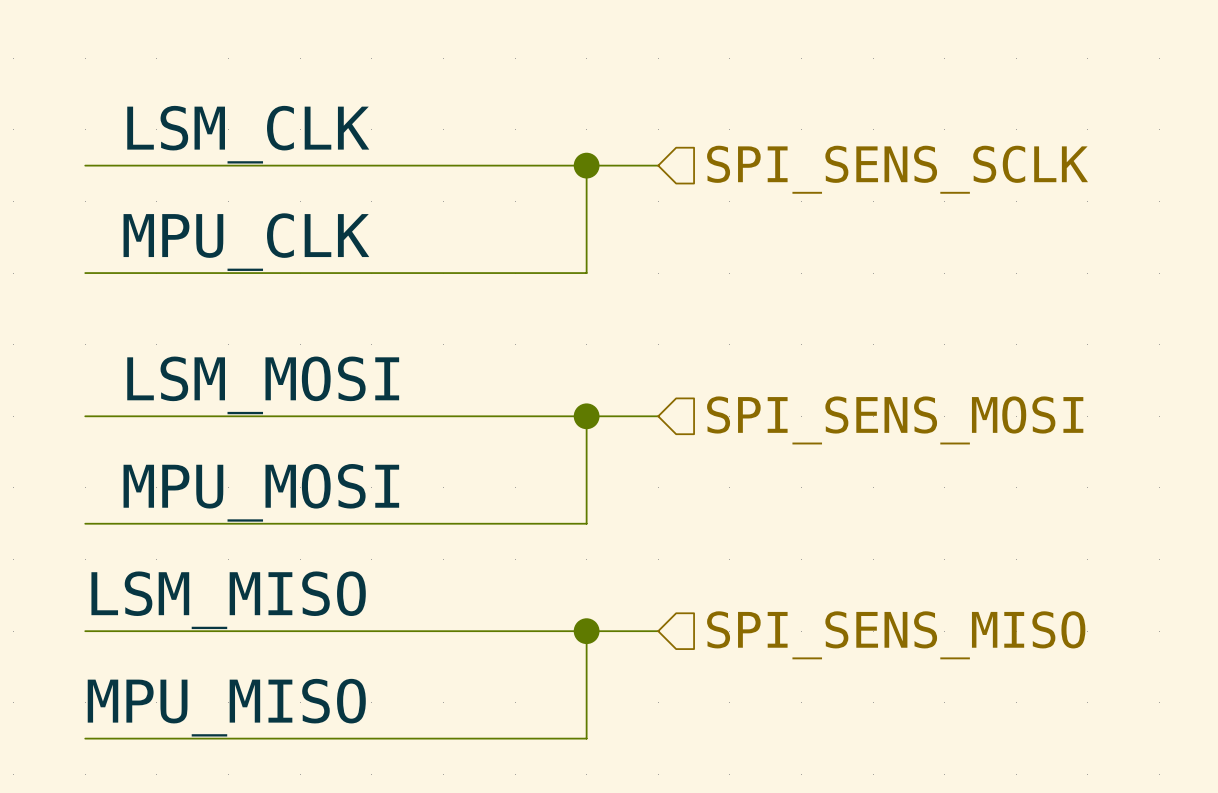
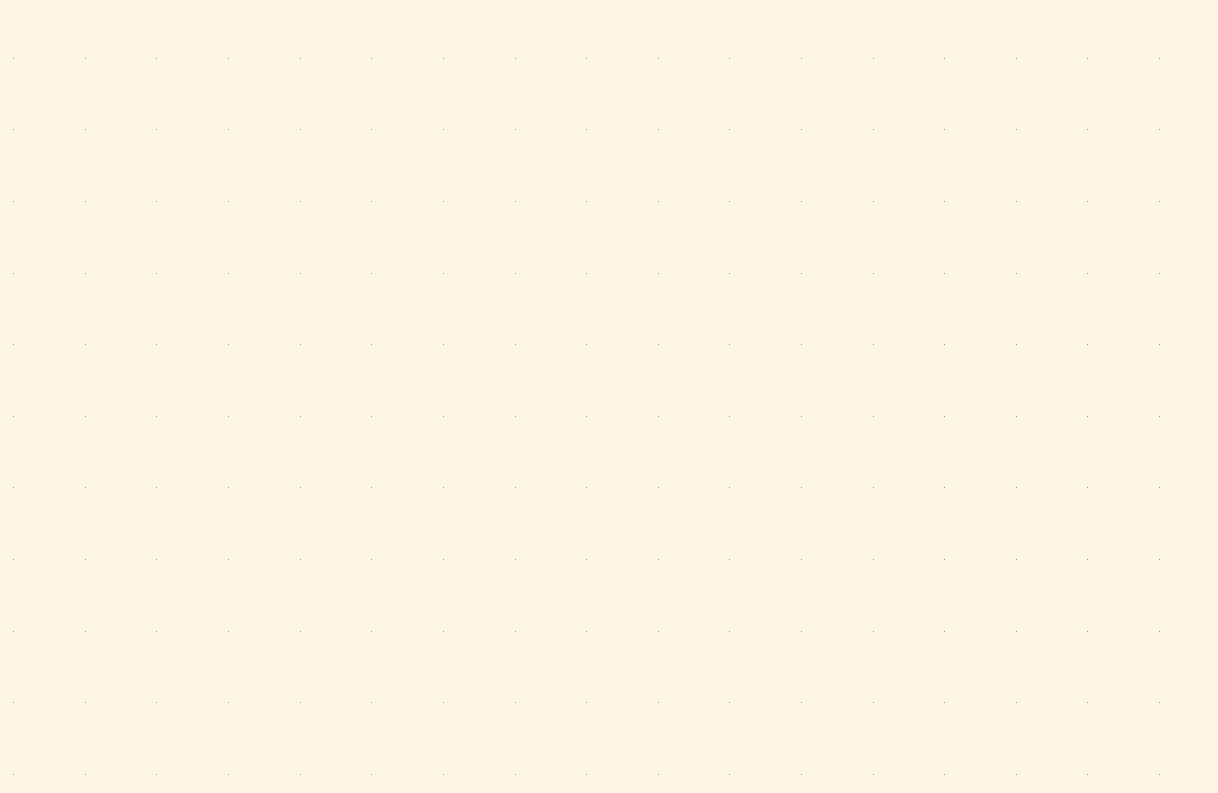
label: LSM_CLK (248, 134) -> none
wire: (85, 165) (658, 165) -> none
wire: (586, 165) (586, 273) (85, 273) -> none
junction: (586, 165) -> none
hierarchical label: SPI_SENS_SCLK (897, 169) -> none
label: MPU_CLK (246, 242) -> none
label: LSM_MOSI (263, 385) -> none
wire: (85, 416) (658, 416) -> none
wire: (586, 416) (586, 523) (85, 523) -> none
junction: (586, 416) -> none
hierarchical label: SPI_SENS_MOSI (895, 420) -> none
label: MPU_MOSI (261, 492) -> none
label: LSM_MISO (228, 600) -> none
wire: (85, 631) (658, 631) -> none
wire: (586, 631) (586, 738) (85, 738) -> none
junction: (586, 631) -> none
hierarchical label: SPI_SENS_MISO (896, 635) -> none
label: MPU_MISO (226, 707) -> none

